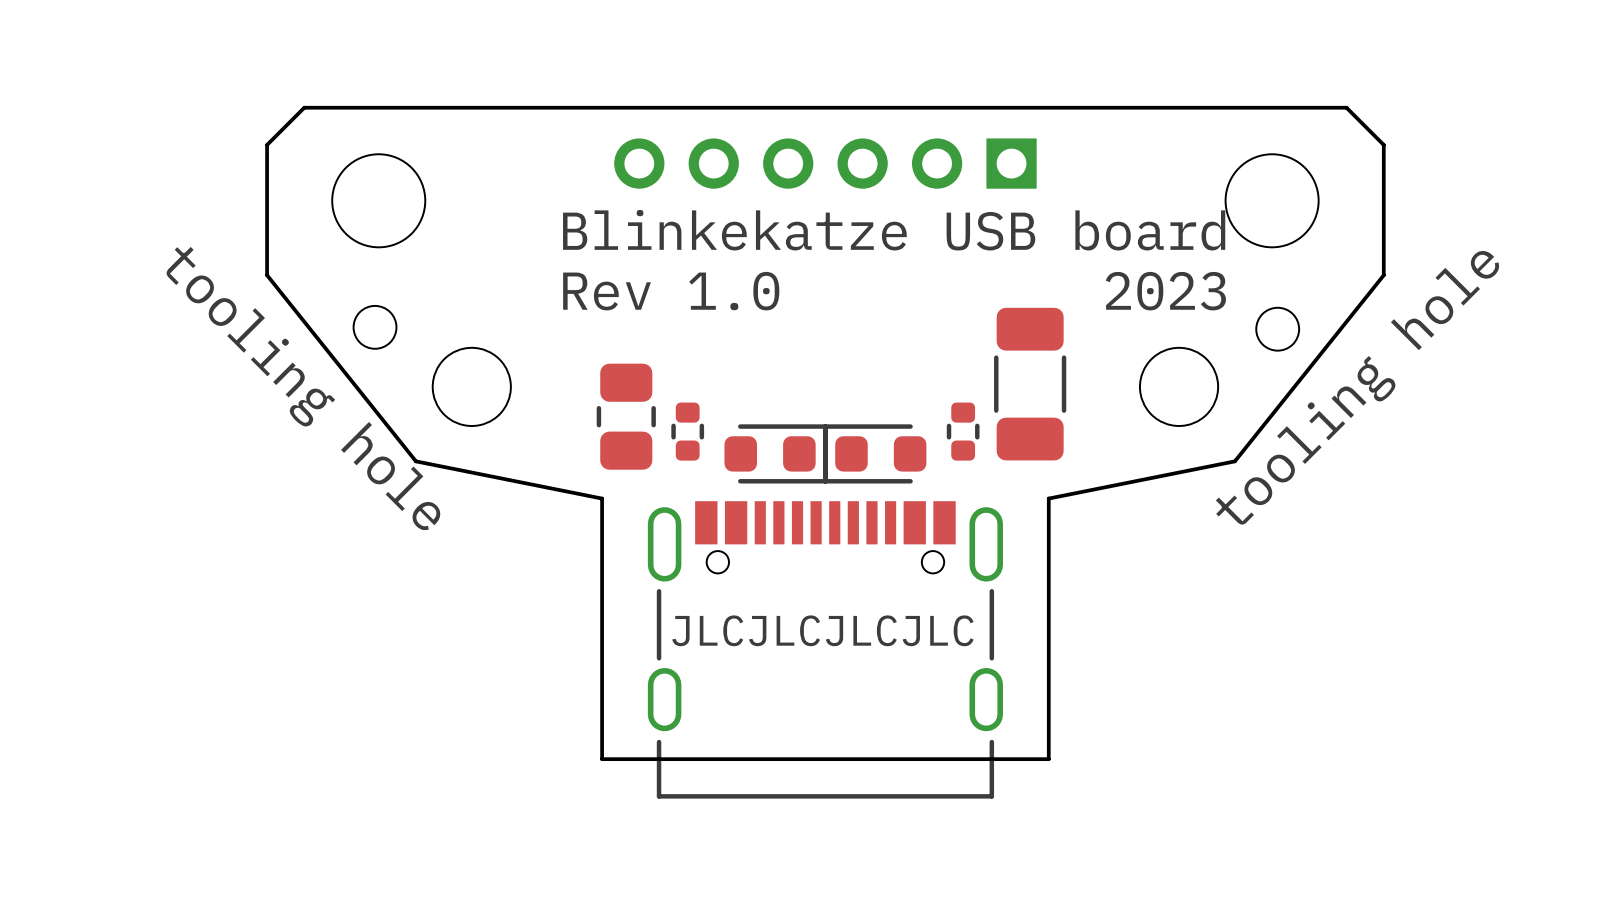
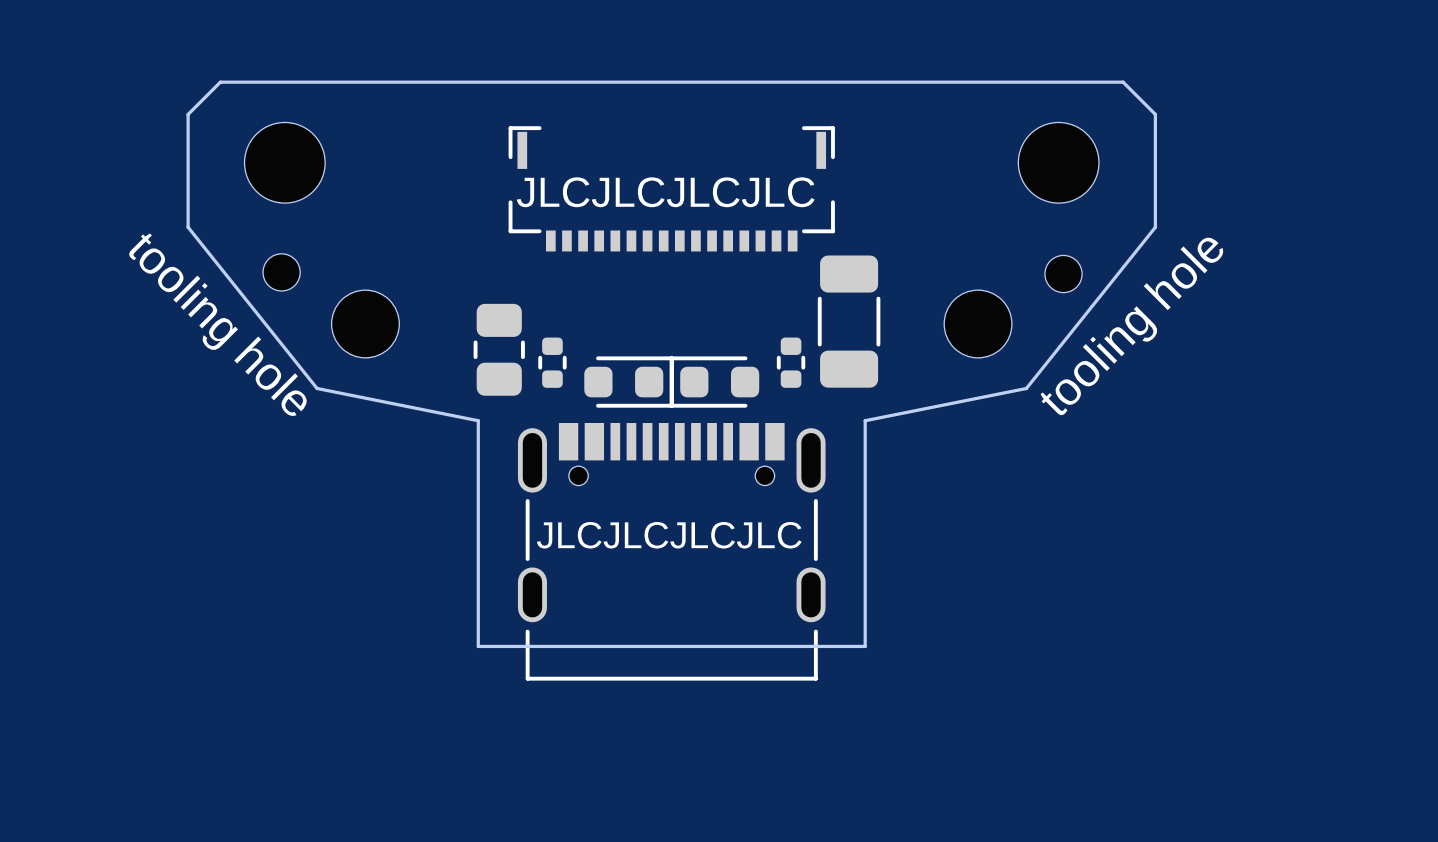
part: (825, 163) -> none
part: none -> (671, 188)
text: Blinkekatze USB board (894, 230) -> none
text: none -> JLCJLCJLCJLC (665, 192)
text: Rev 1.0 2023 (894, 291) -> none

